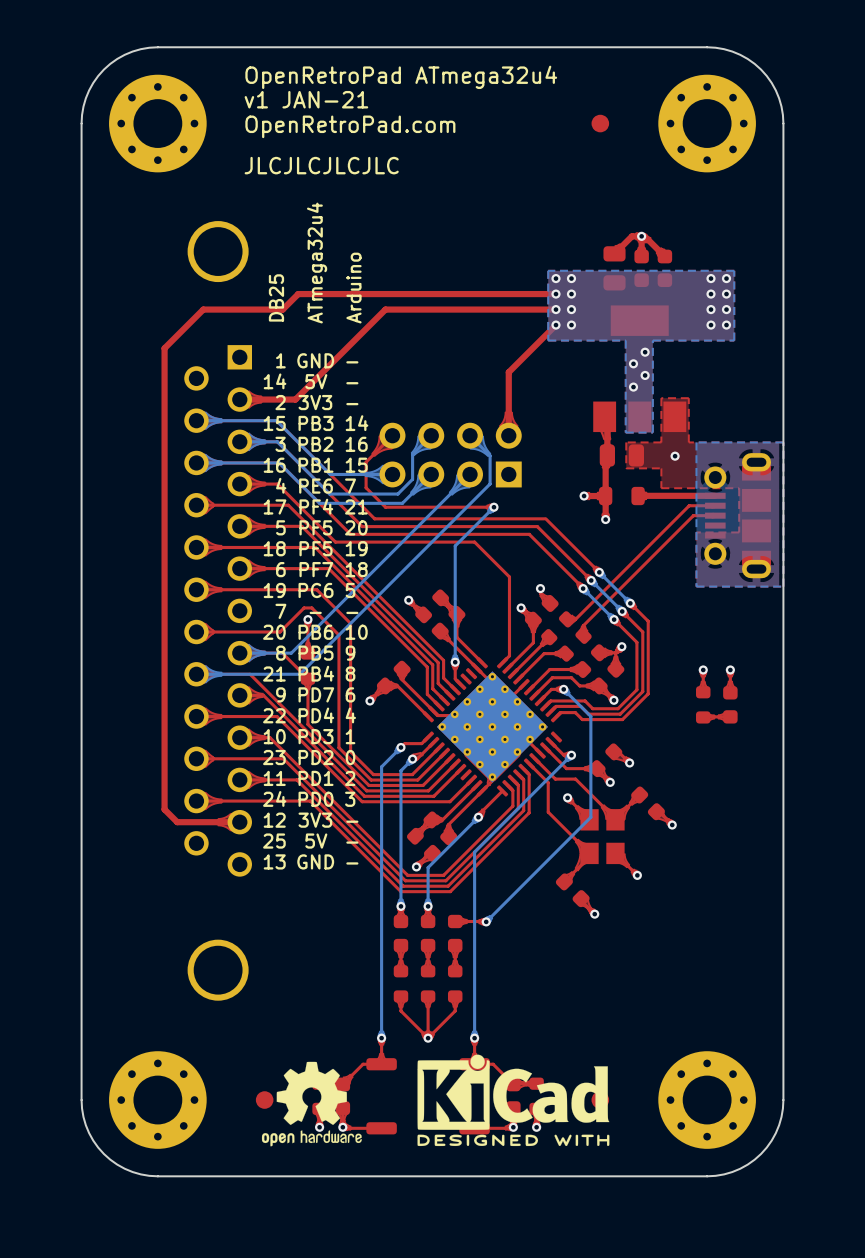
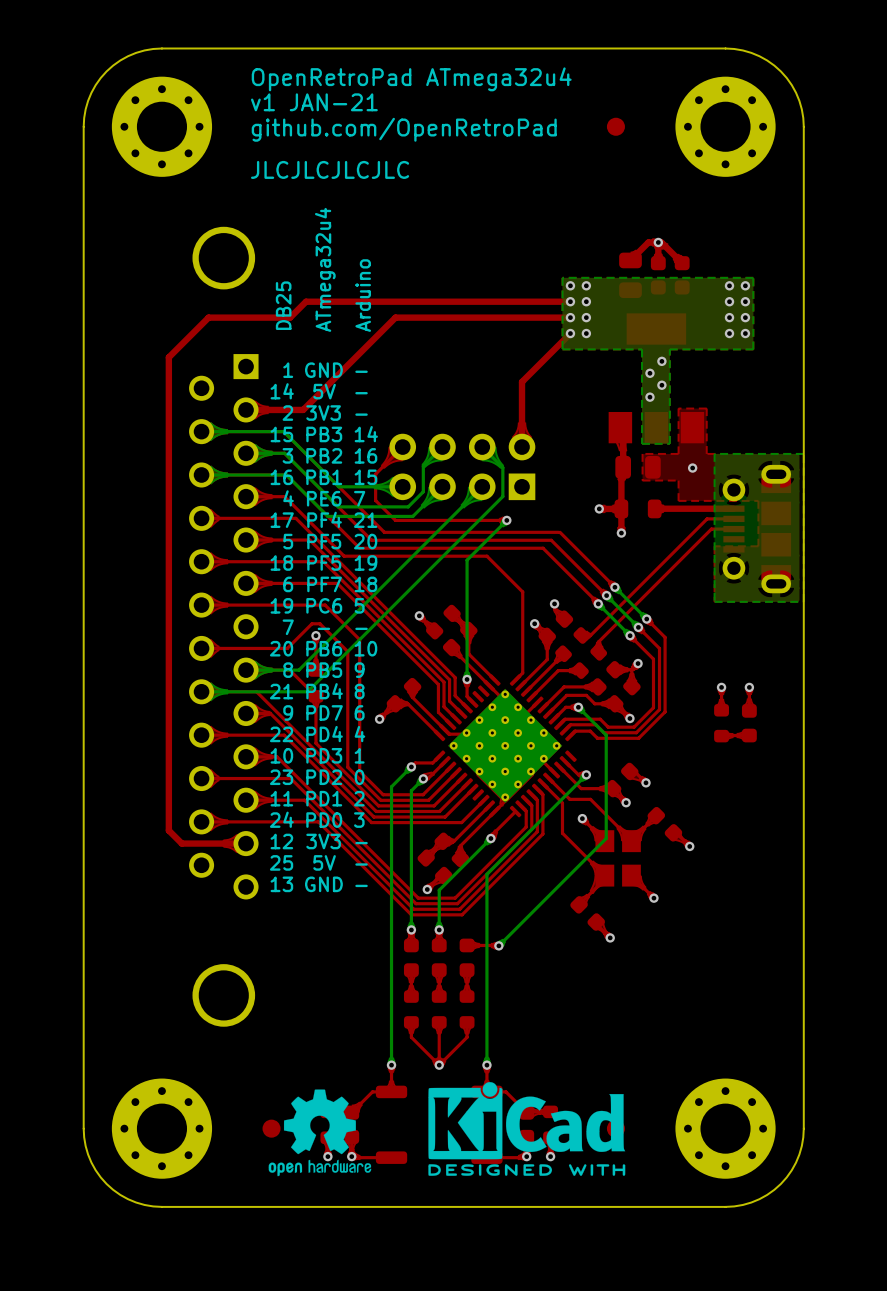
text: OpenRetroPad.com (350, 126) -> github.com/OpenRetroPad (404, 129)

